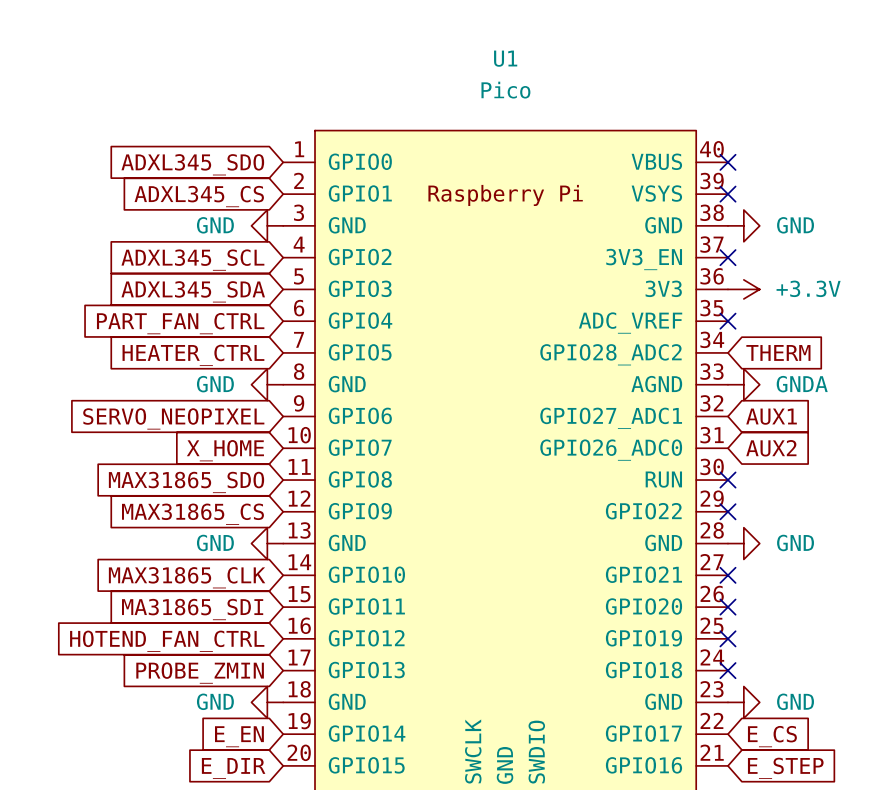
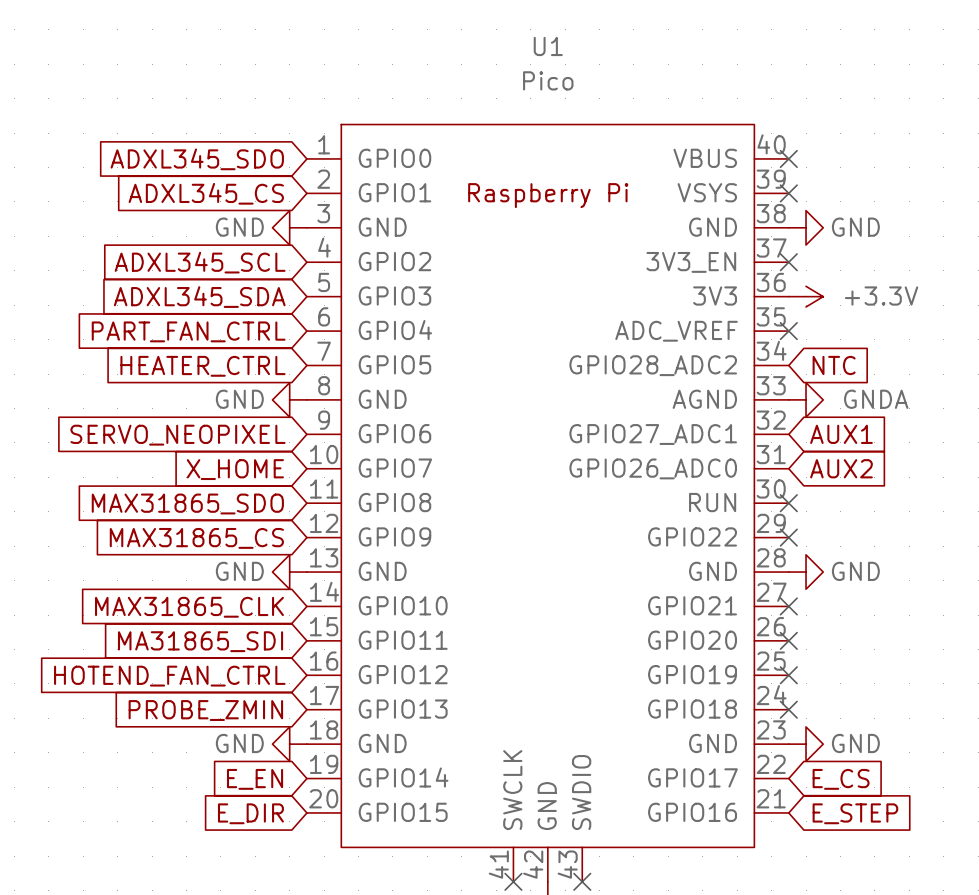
global label: THERM (778, 352) -> NTC (834, 365)

